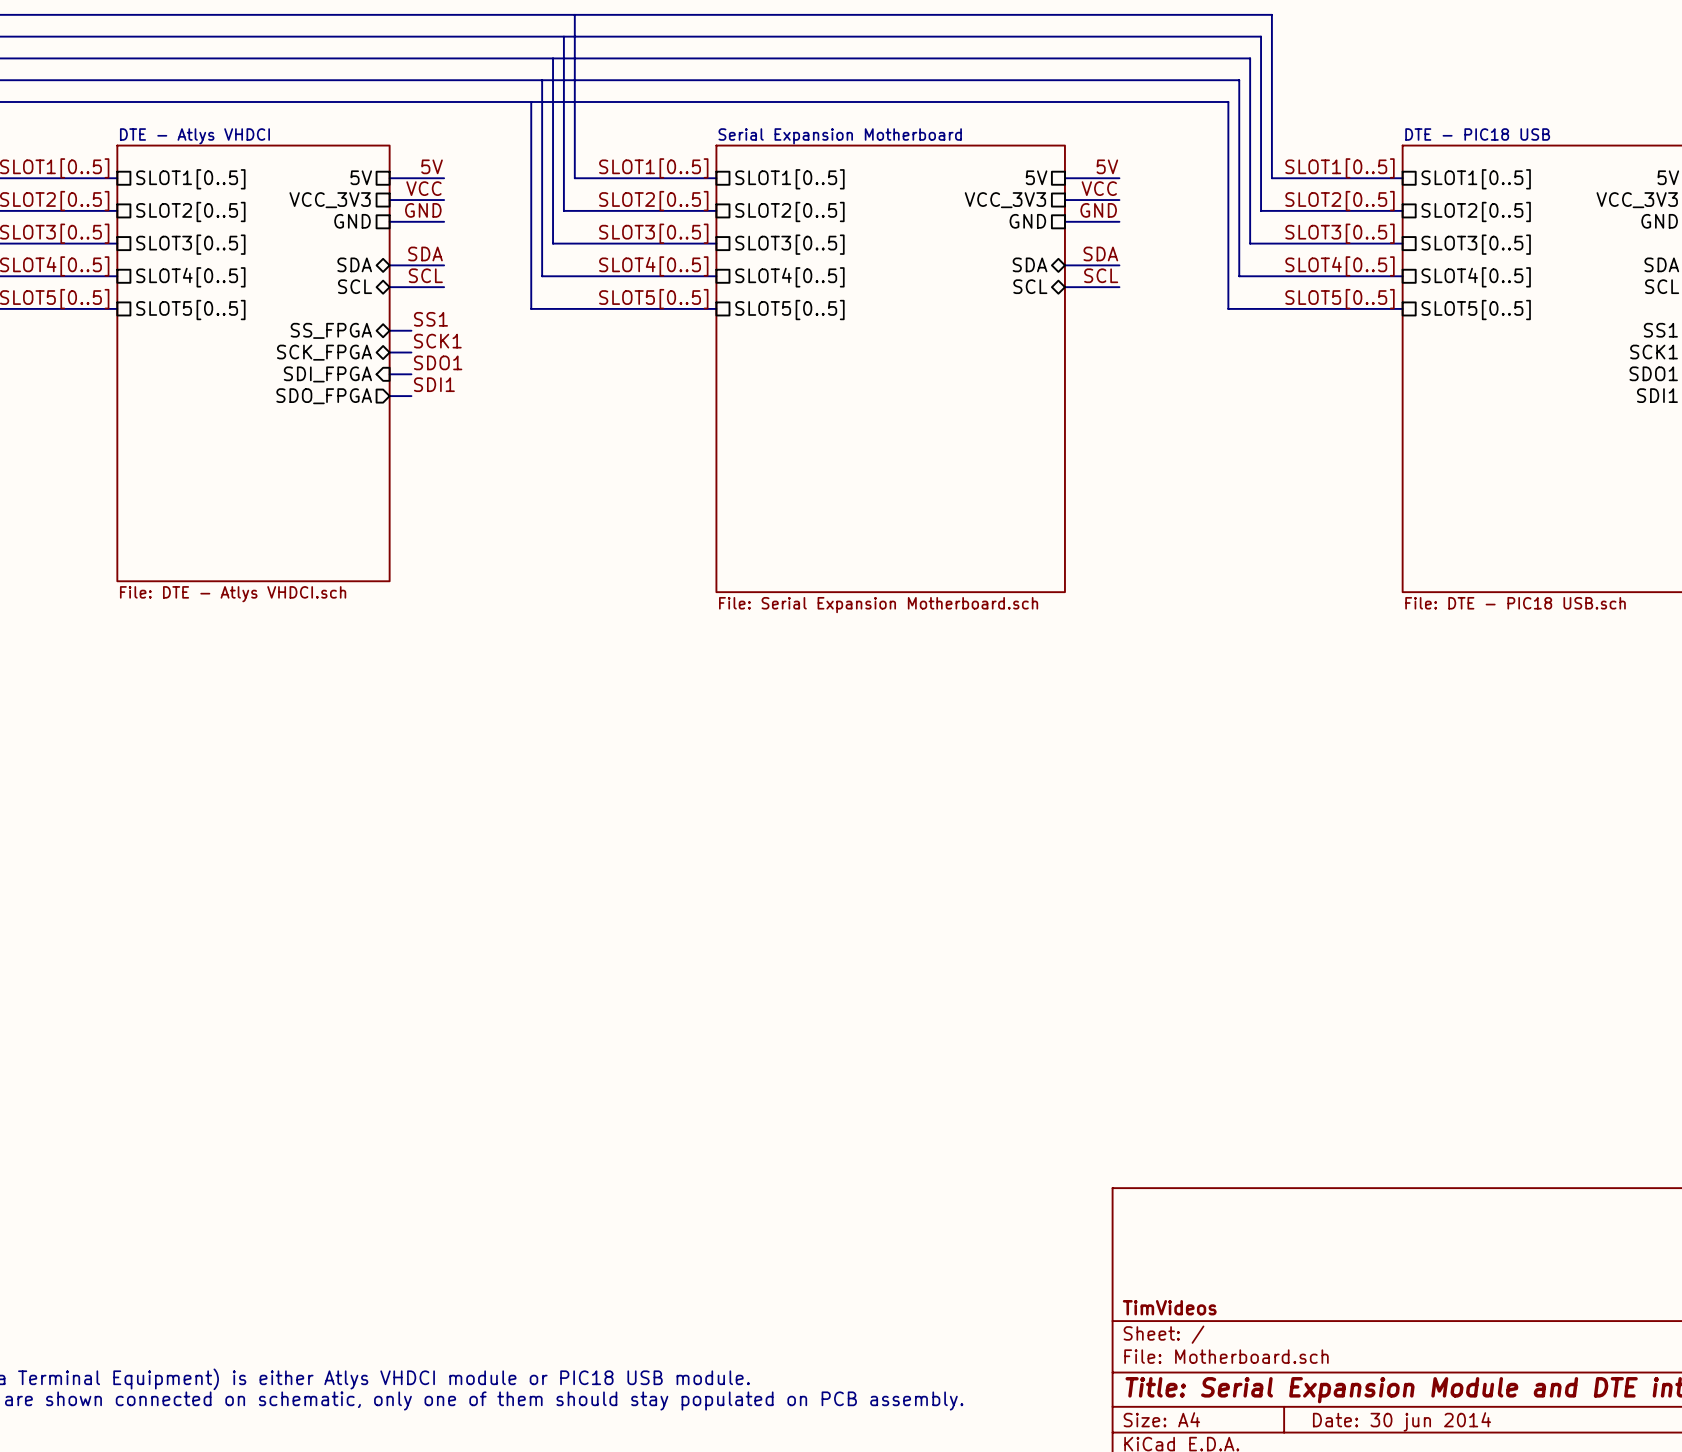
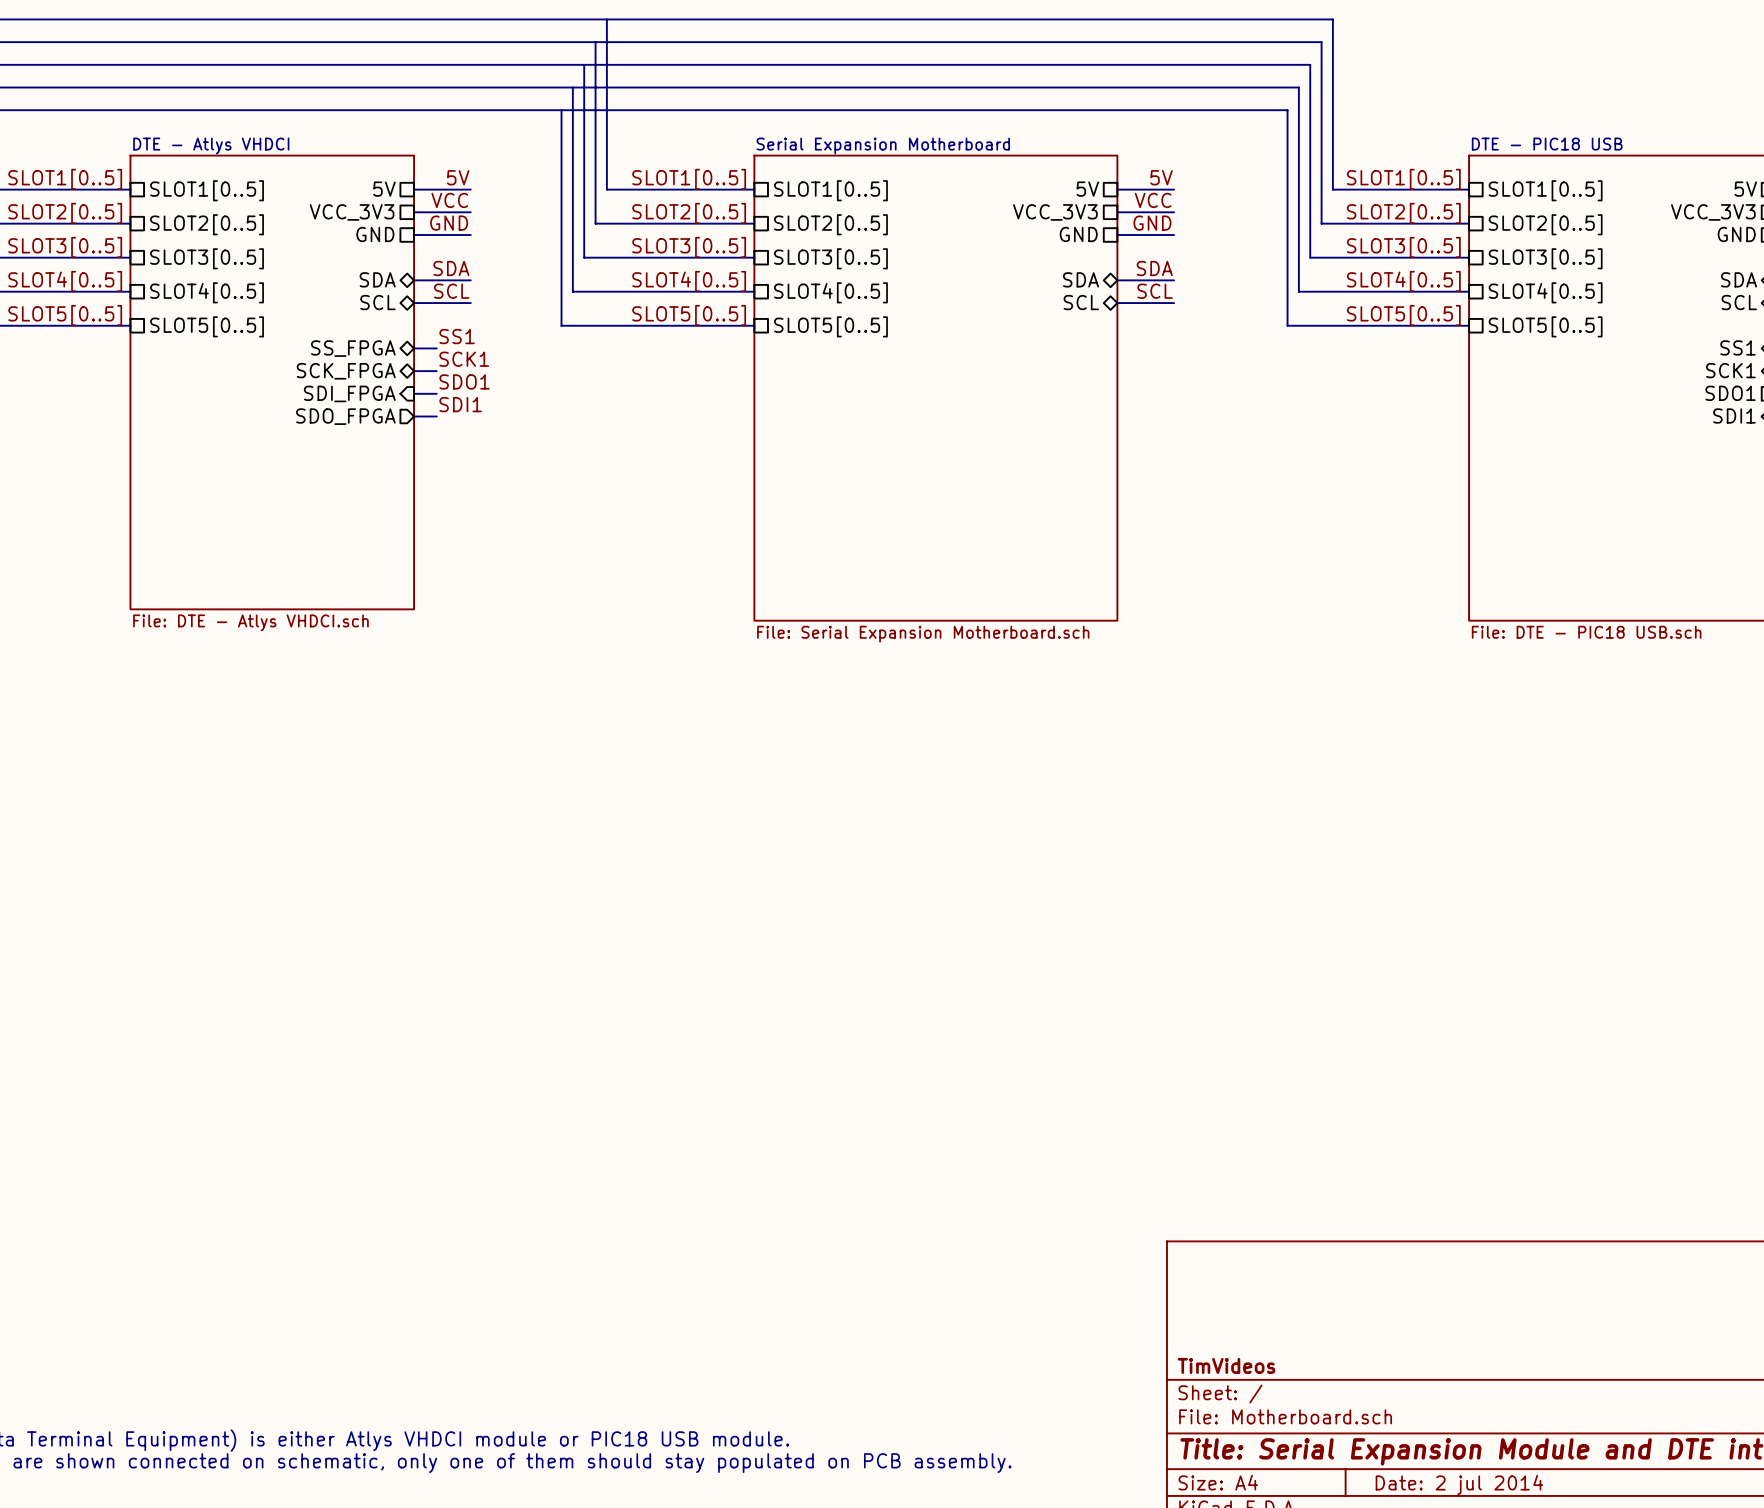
title block: Date: 30 jun 2014 (1401, 1421) -> Date: 2 jul 2014 (1459, 1484)

